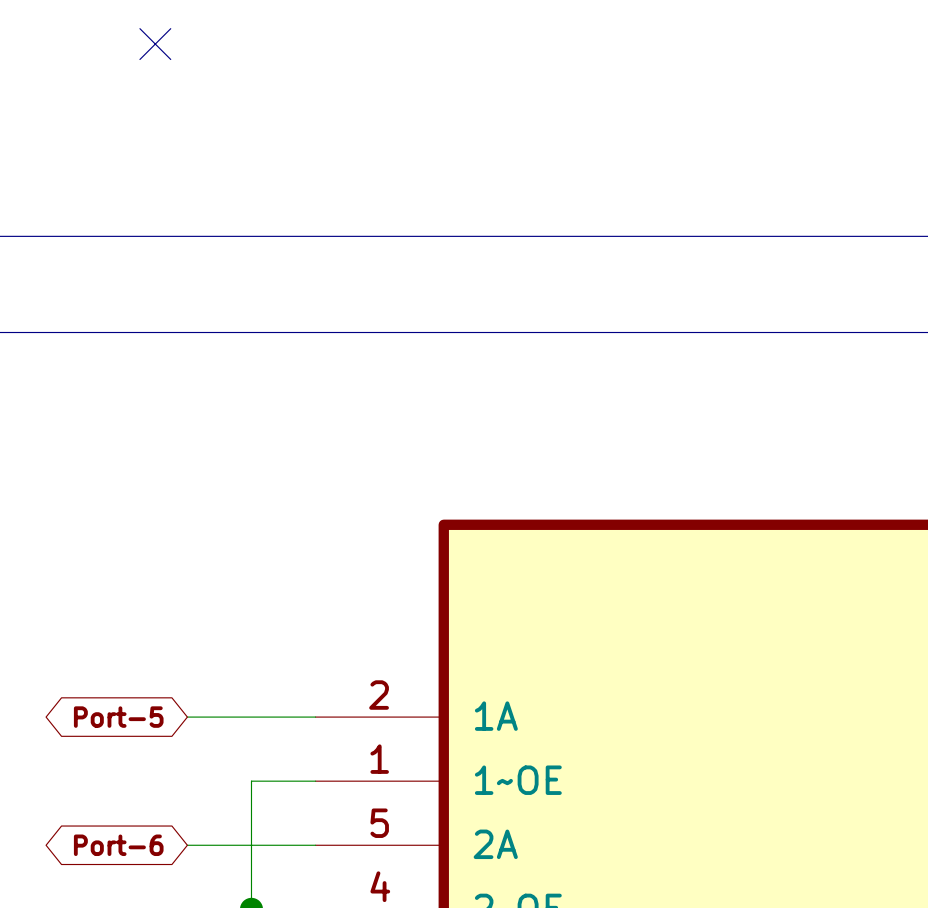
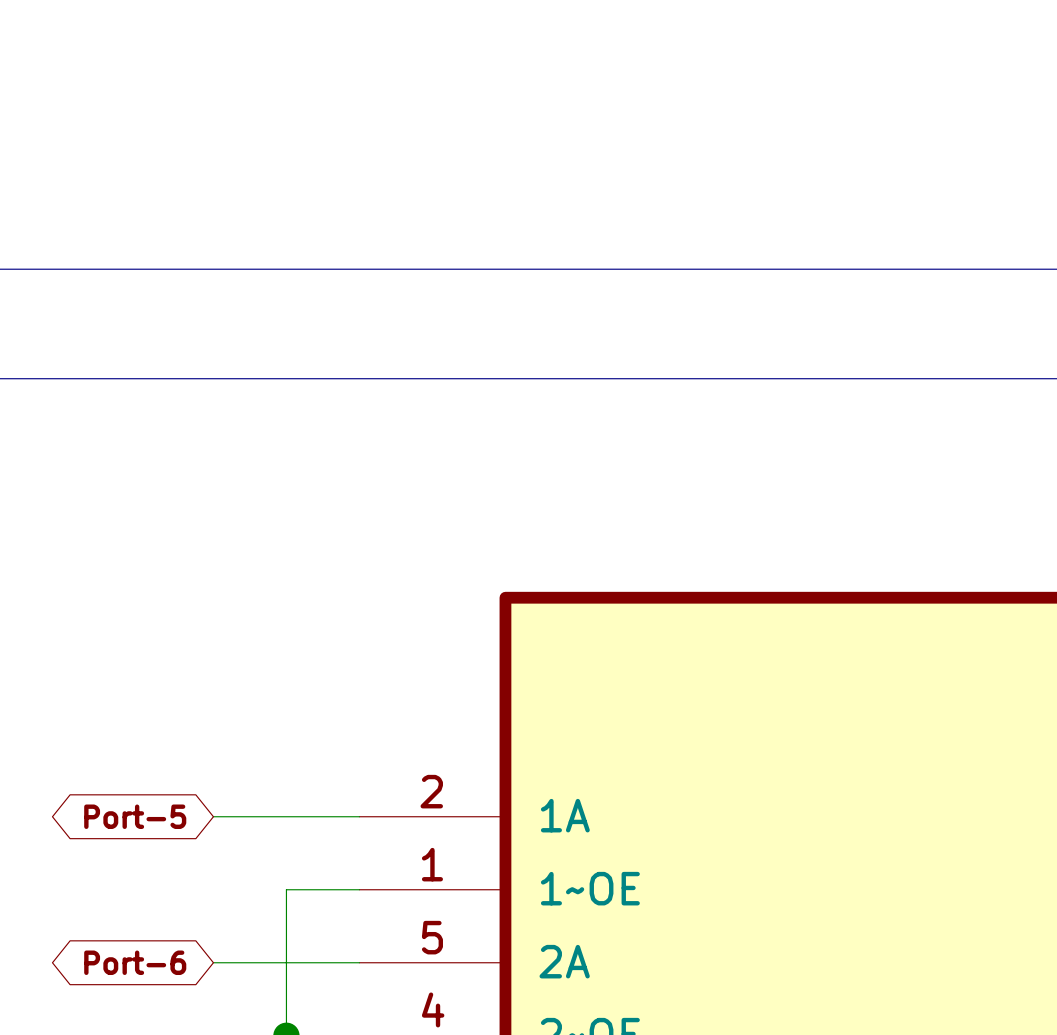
no-connect mark: (155, 44) -> none

